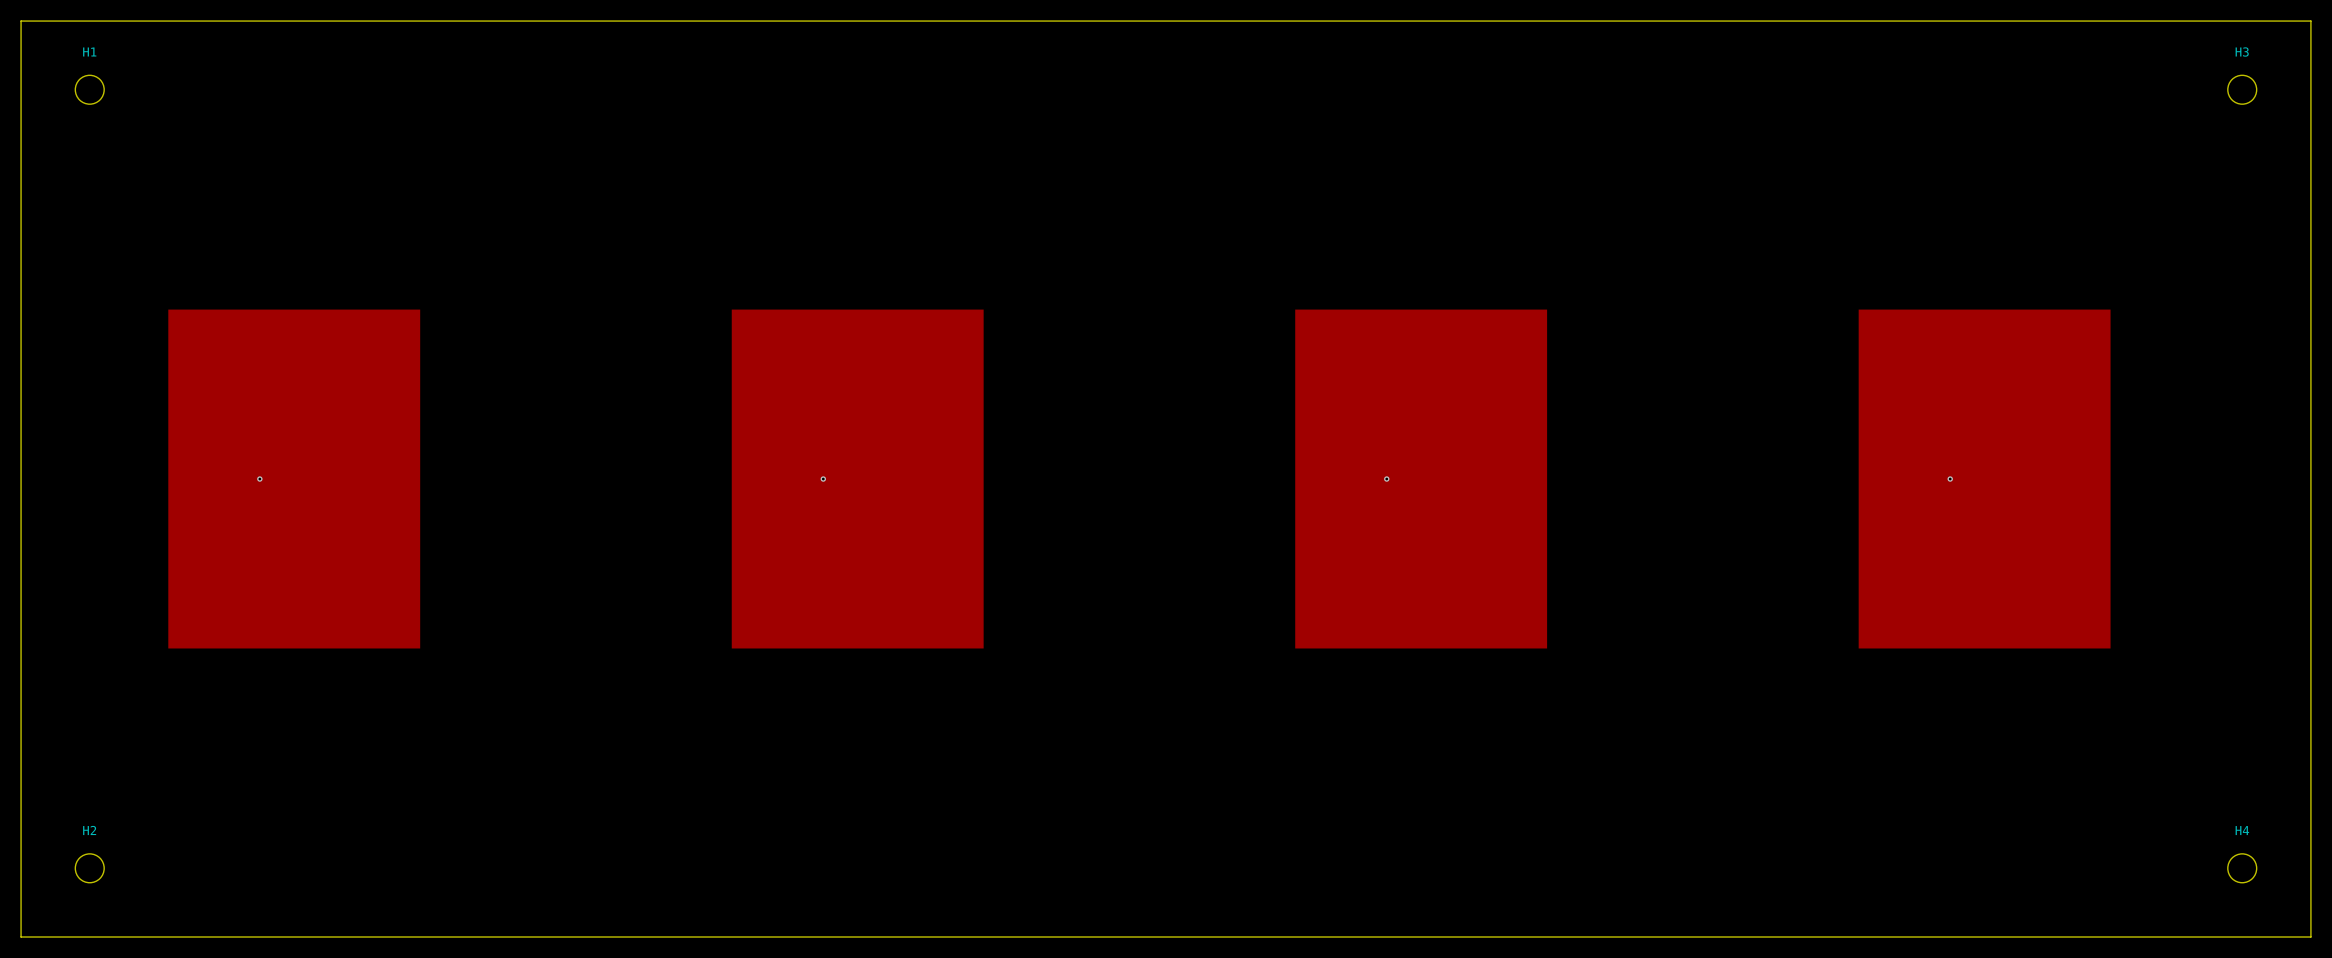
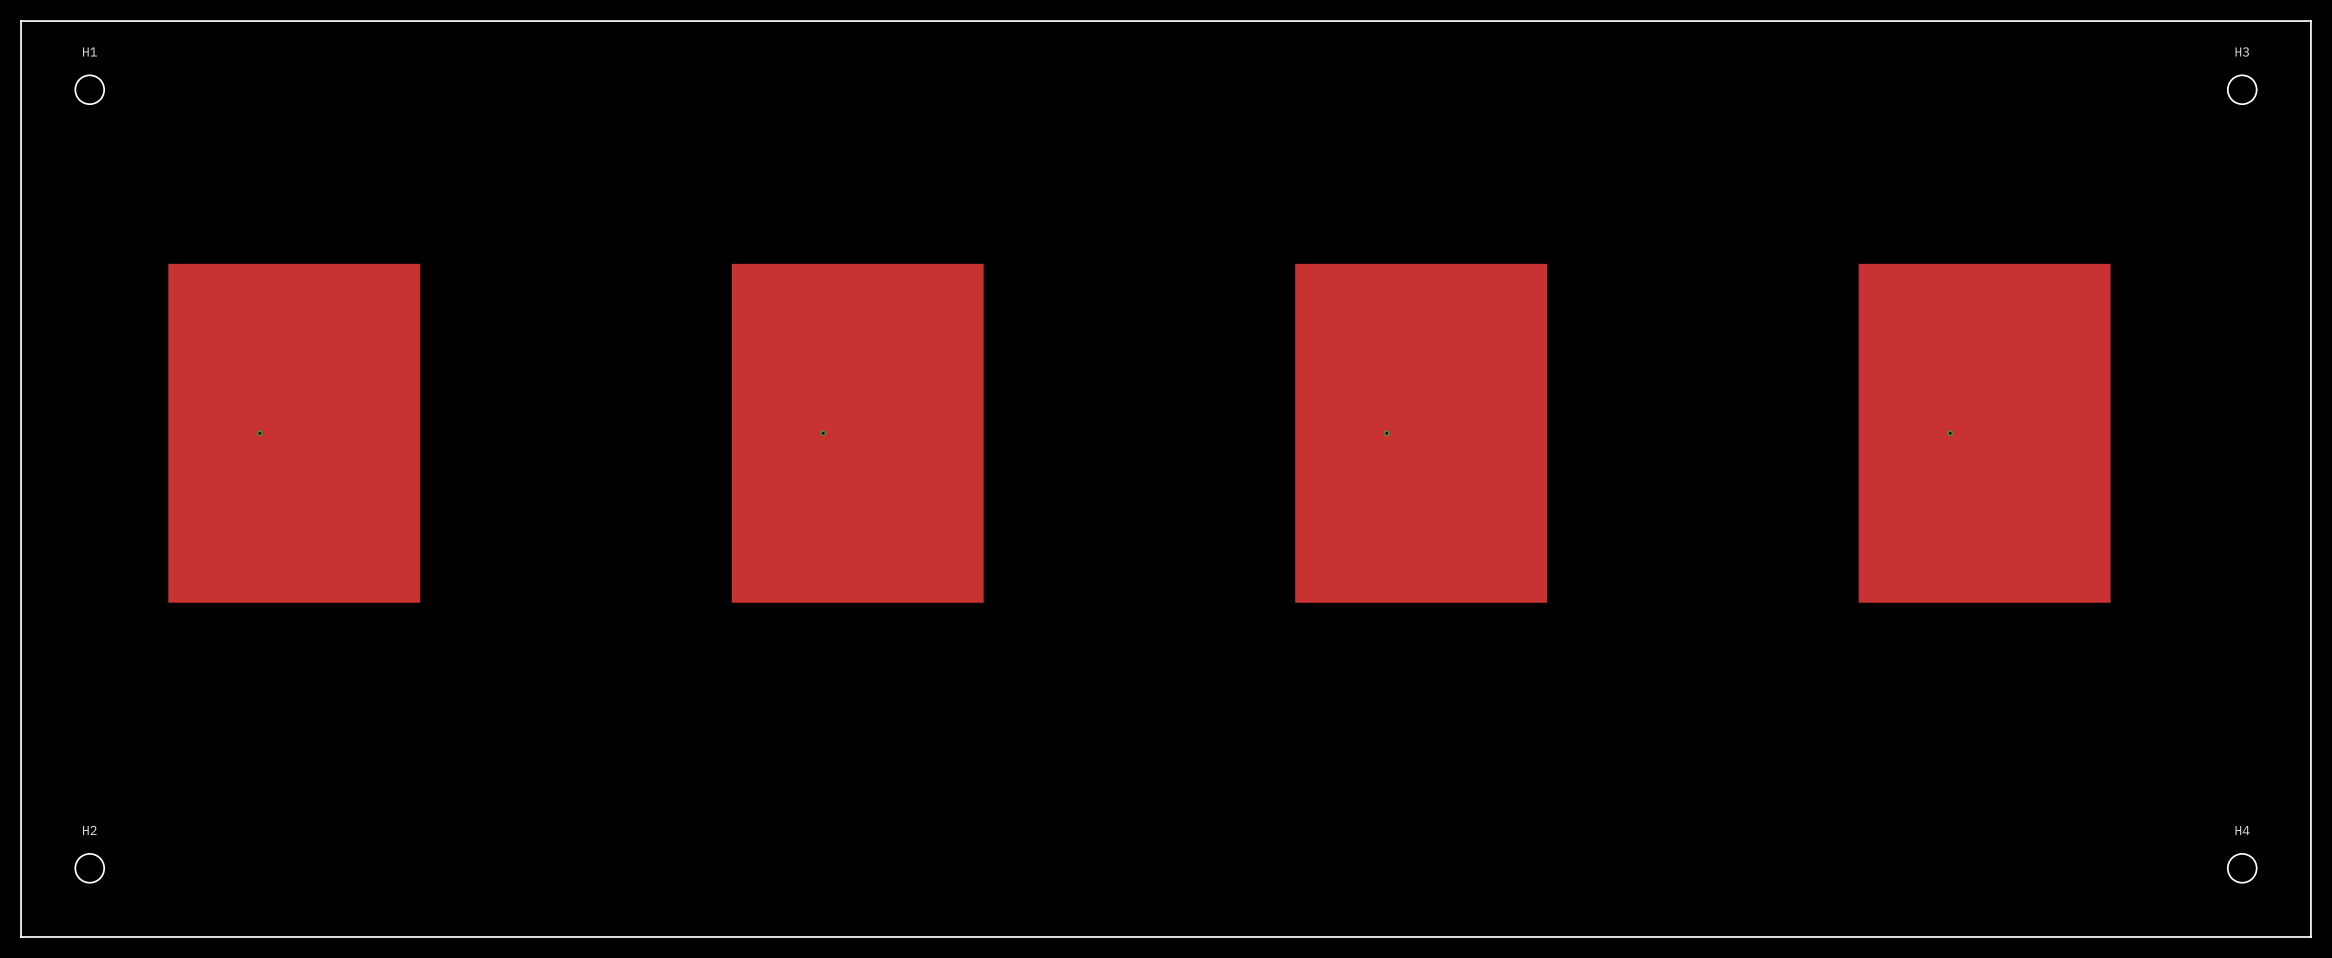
via position: (259, 479) -> (259, 433)
drawing position: (294, 479) -> (294, 433)
via position: (823, 479) -> (823, 433)
drawing position: (857, 479) -> (857, 433)
via position: (1386, 479) -> (1386, 433)
drawing position: (1421, 479) -> (1421, 433)
via position: (1950, 479) -> (1950, 433)
drawing position: (1984, 479) -> (1984, 433)

